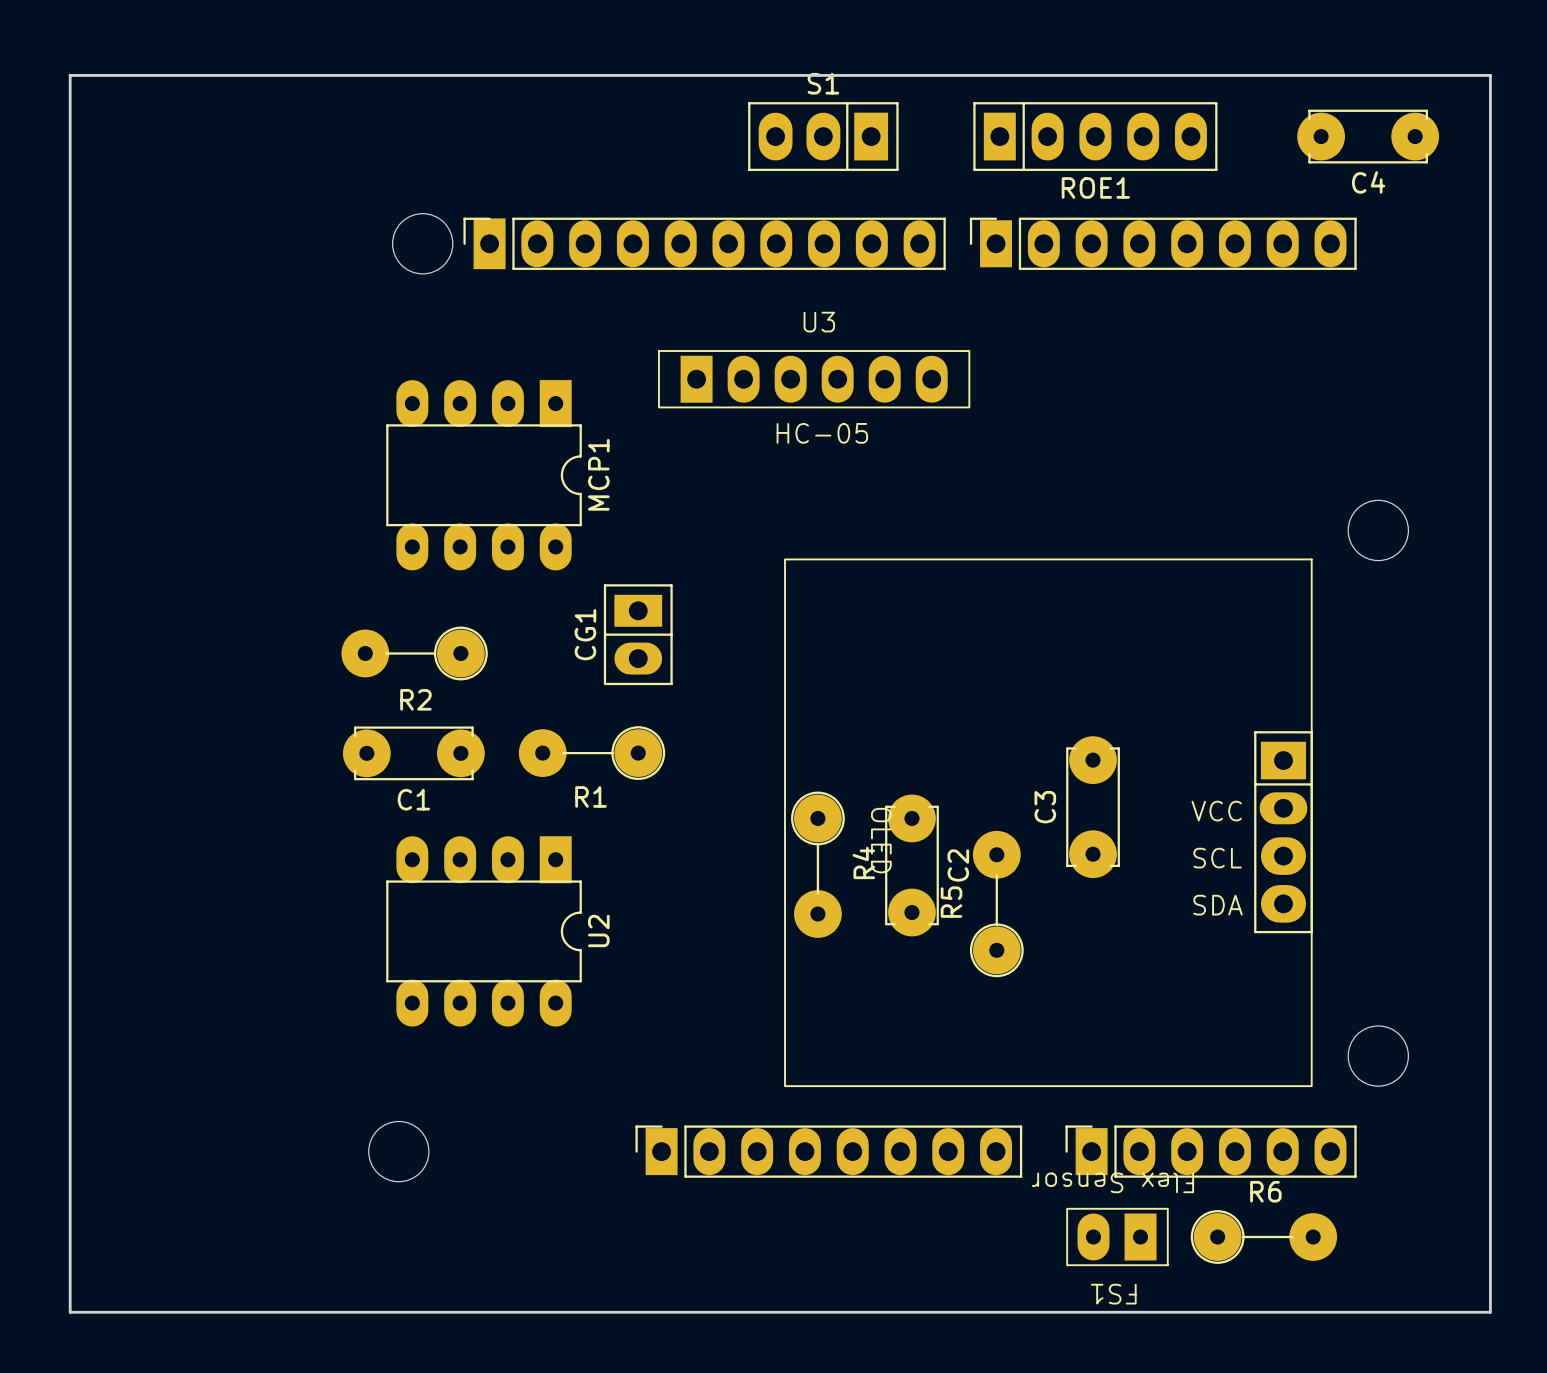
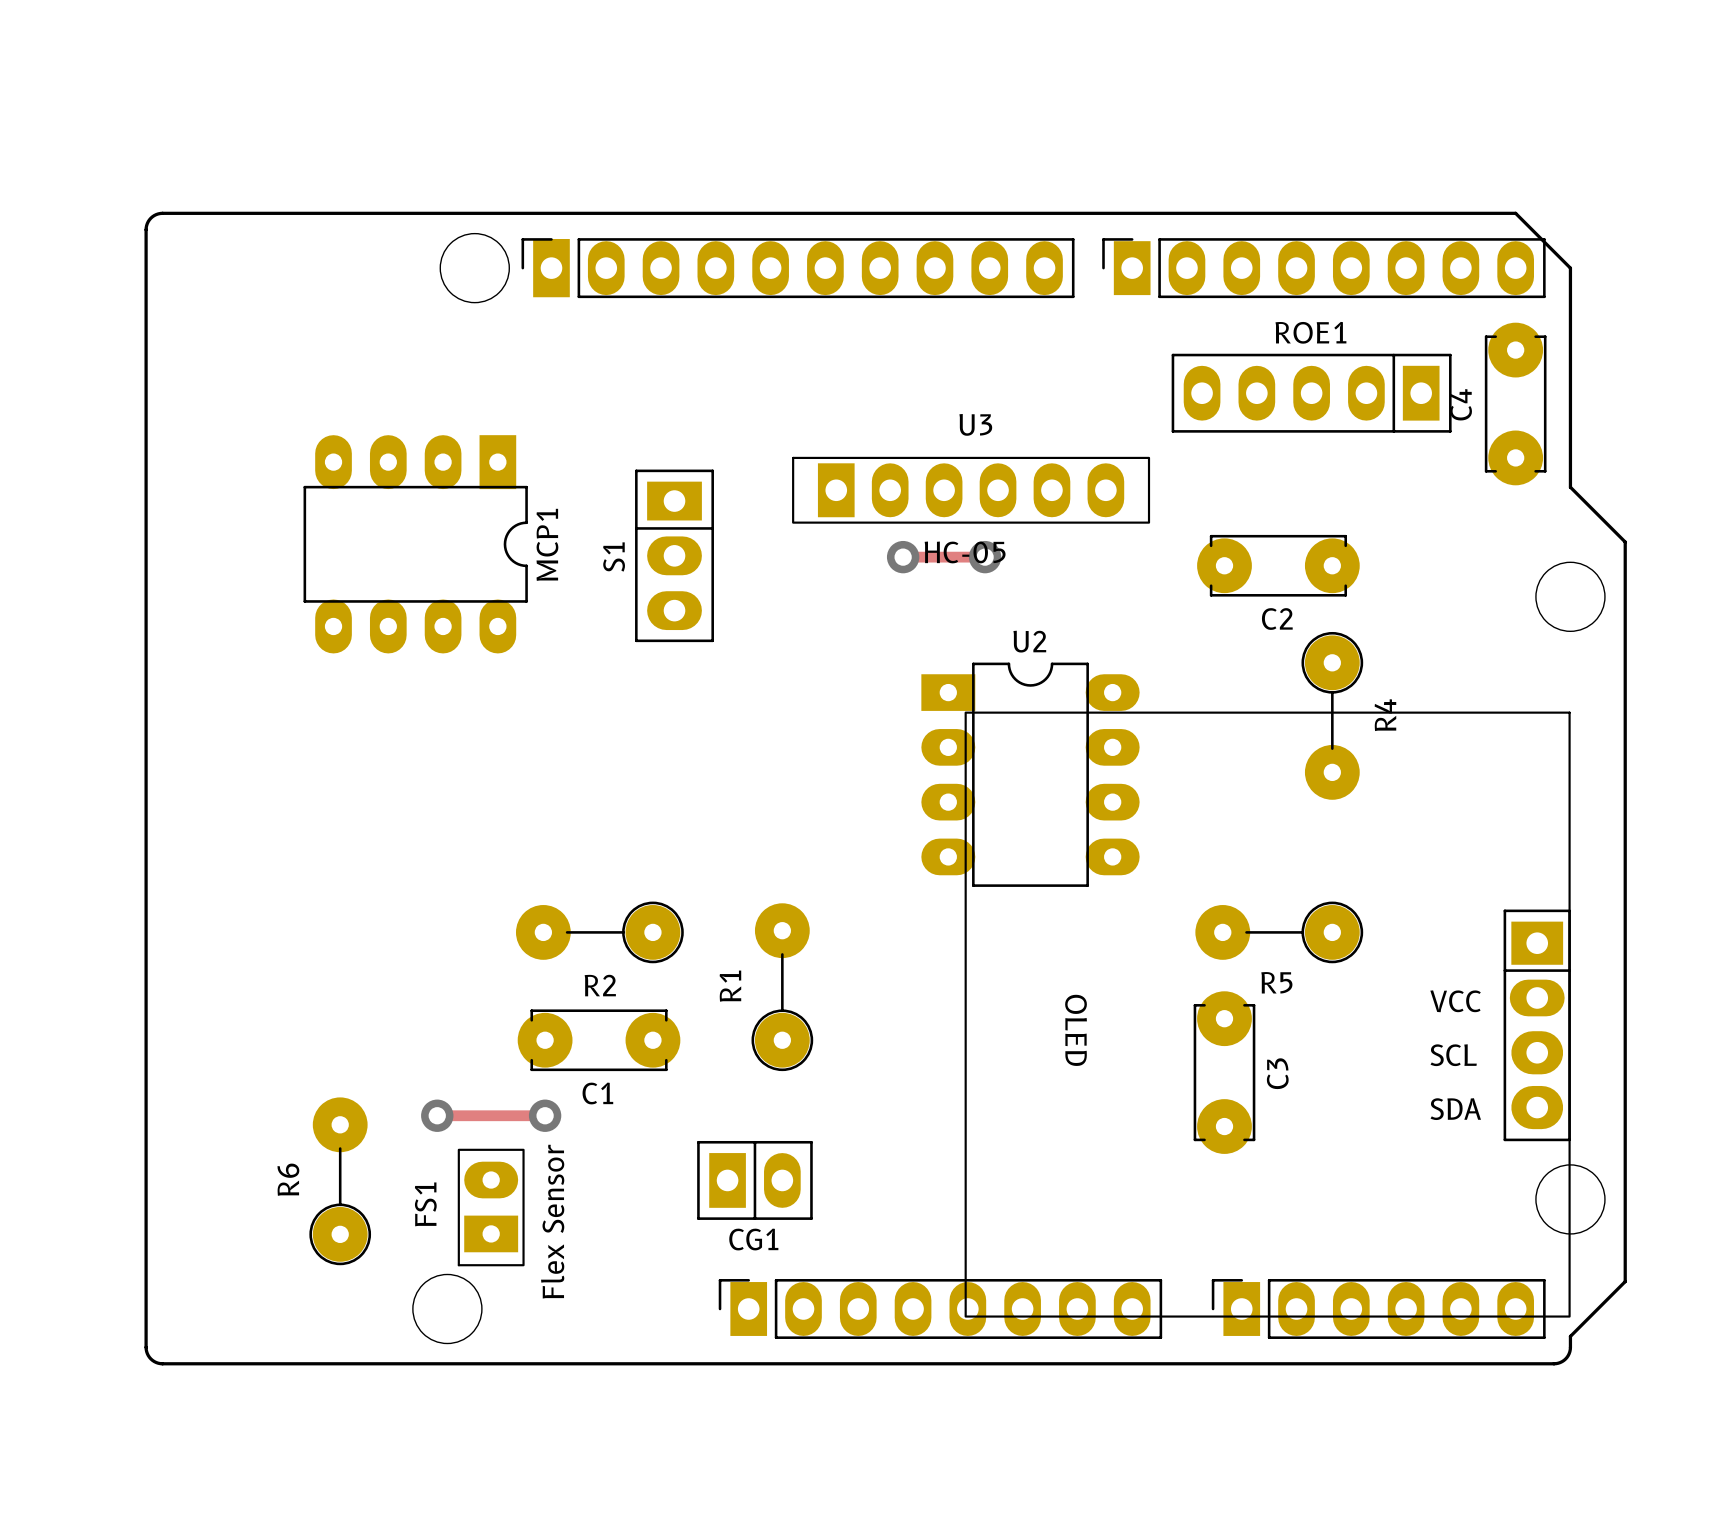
board edge: (70, 75) (1490, 75) (1490, 1312) (70, 1312) (70, 75) -> (162, 213) (150, 218) (146, 229) (146, 1347) (148, 1355) (152, 1360) (162, 1363) (1554, 1363) (1562, 1361) (1567, 1357) (1570, 1349) (1570, 1336) (1625, 1281) (1625, 542) (1570, 487) (1570, 268) (1515, 213) (162, 213)
S1 rotation: 0° (823, 136) -> 90° counterclockwise (674, 555)
S1 position: (823, 136) -> (674, 555)
ROE1 rotation: 0° (1095, 136) -> 180° (1311, 393)
ROE1 position: (1095, 136) -> (1311, 393)
C4 rotation: 0° (1368, 136) -> 90° clockwise (1515, 404)
C4 position: (1368, 136) -> (1515, 404)
U3 position: (814, 379) -> (971, 490)
MCP1 position: (484, 475) -> (415, 544)
track: none -> (903, 557) (985, 557)
via: none -> (903, 557)
via: none -> (985, 557)
CG1 rotation: 0° (638, 634) -> 90° counterclockwise (754, 1180)
CG1 position: (638, 634) -> (754, 1180)
R2 position: (414, 653) -> (599, 932)
C1 position: (413, 753) -> (599, 1040)
R1 rotation: 0° (592, 753) -> 90° clockwise (782, 987)
R1 position: (592, 753) -> (782, 987)
C3 name position: C3 (1045, 807) -> C3 (1277, 1073)
C3 position: (1093, 807) -> (1224, 1072)
part position: (1048, 822) -> (1267, 1014)
R4 position: (817, 864) -> (1332, 715)
C2 rotation: 0° (911, 865) -> 90° clockwise (1278, 565)
C2 position: (911, 865) -> (1278, 565)
R5 rotation: 0° (996, 904) -> 90° counterclockwise (1279, 932)
R5 position: (996, 904) -> (1279, 932)
U2 rotation: 0° (484, 931) -> 90° counterclockwise (1030, 774)
U2 position: (484, 931) -> (1030, 774)
track: none -> (437, 1115) (545, 1115)
via: none -> (437, 1115)
via: none -> (545, 1115)
FS1 rotation: 0° (1117, 1237) -> 90° clockwise (491, 1207)
FS1 position: (1117, 1237) -> (491, 1207)
R6 rotation: 0° (1263, 1237) -> 90° counterclockwise (340, 1181)
R6 position: (1263, 1237) -> (340, 1181)

